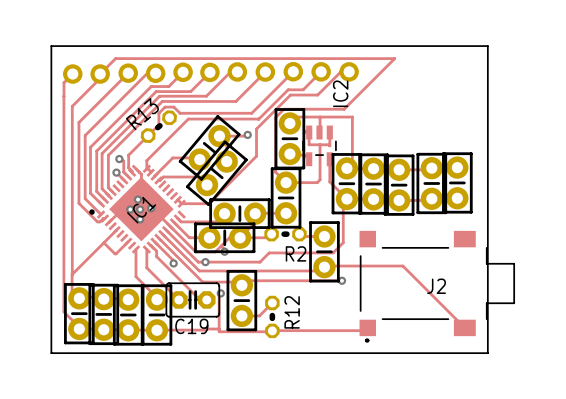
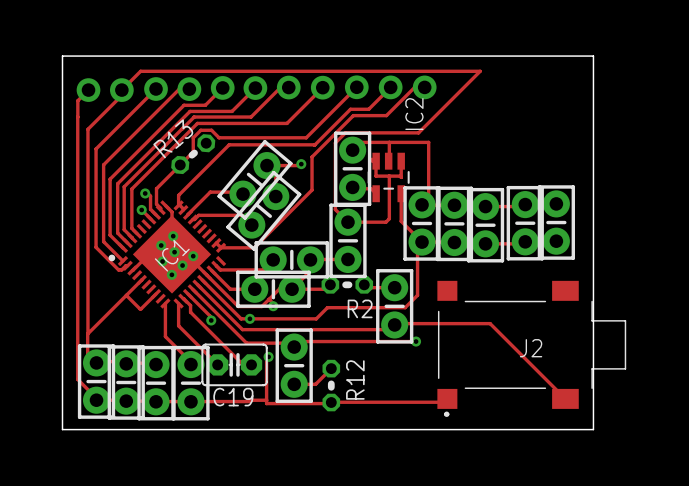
via: none -> (173, 236)
via: (138, 199) -> none
via: none -> (161, 245)
via: none -> (174, 252)
via: (151, 208) -> none
via: (130, 209) -> none
via: (140, 209) -> none
via: none -> (193, 256)
via: none -> (162, 261)
via: none -> (182, 265)
via: (140, 219) -> none
via: none -> (171, 274)

